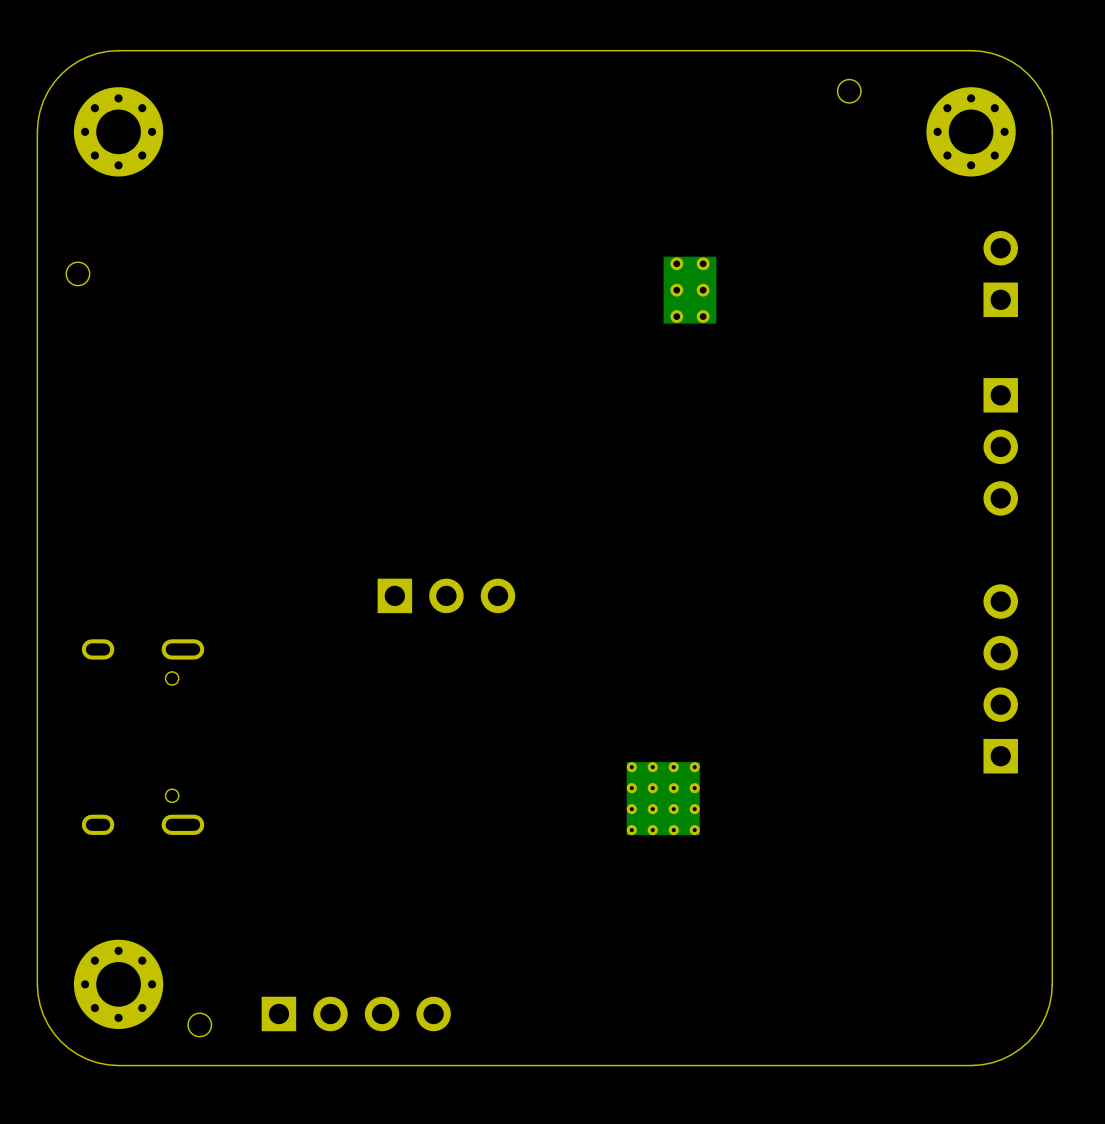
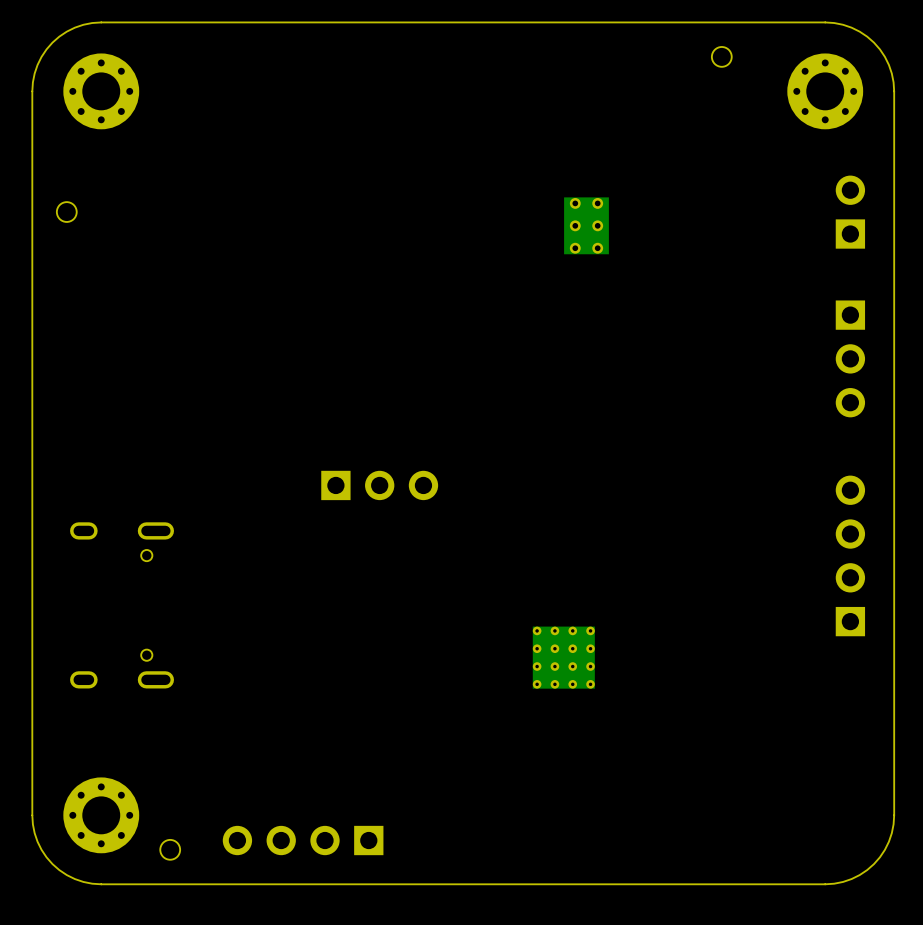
part rotation: 0° (356, 1014) -> 180° (303, 840)

